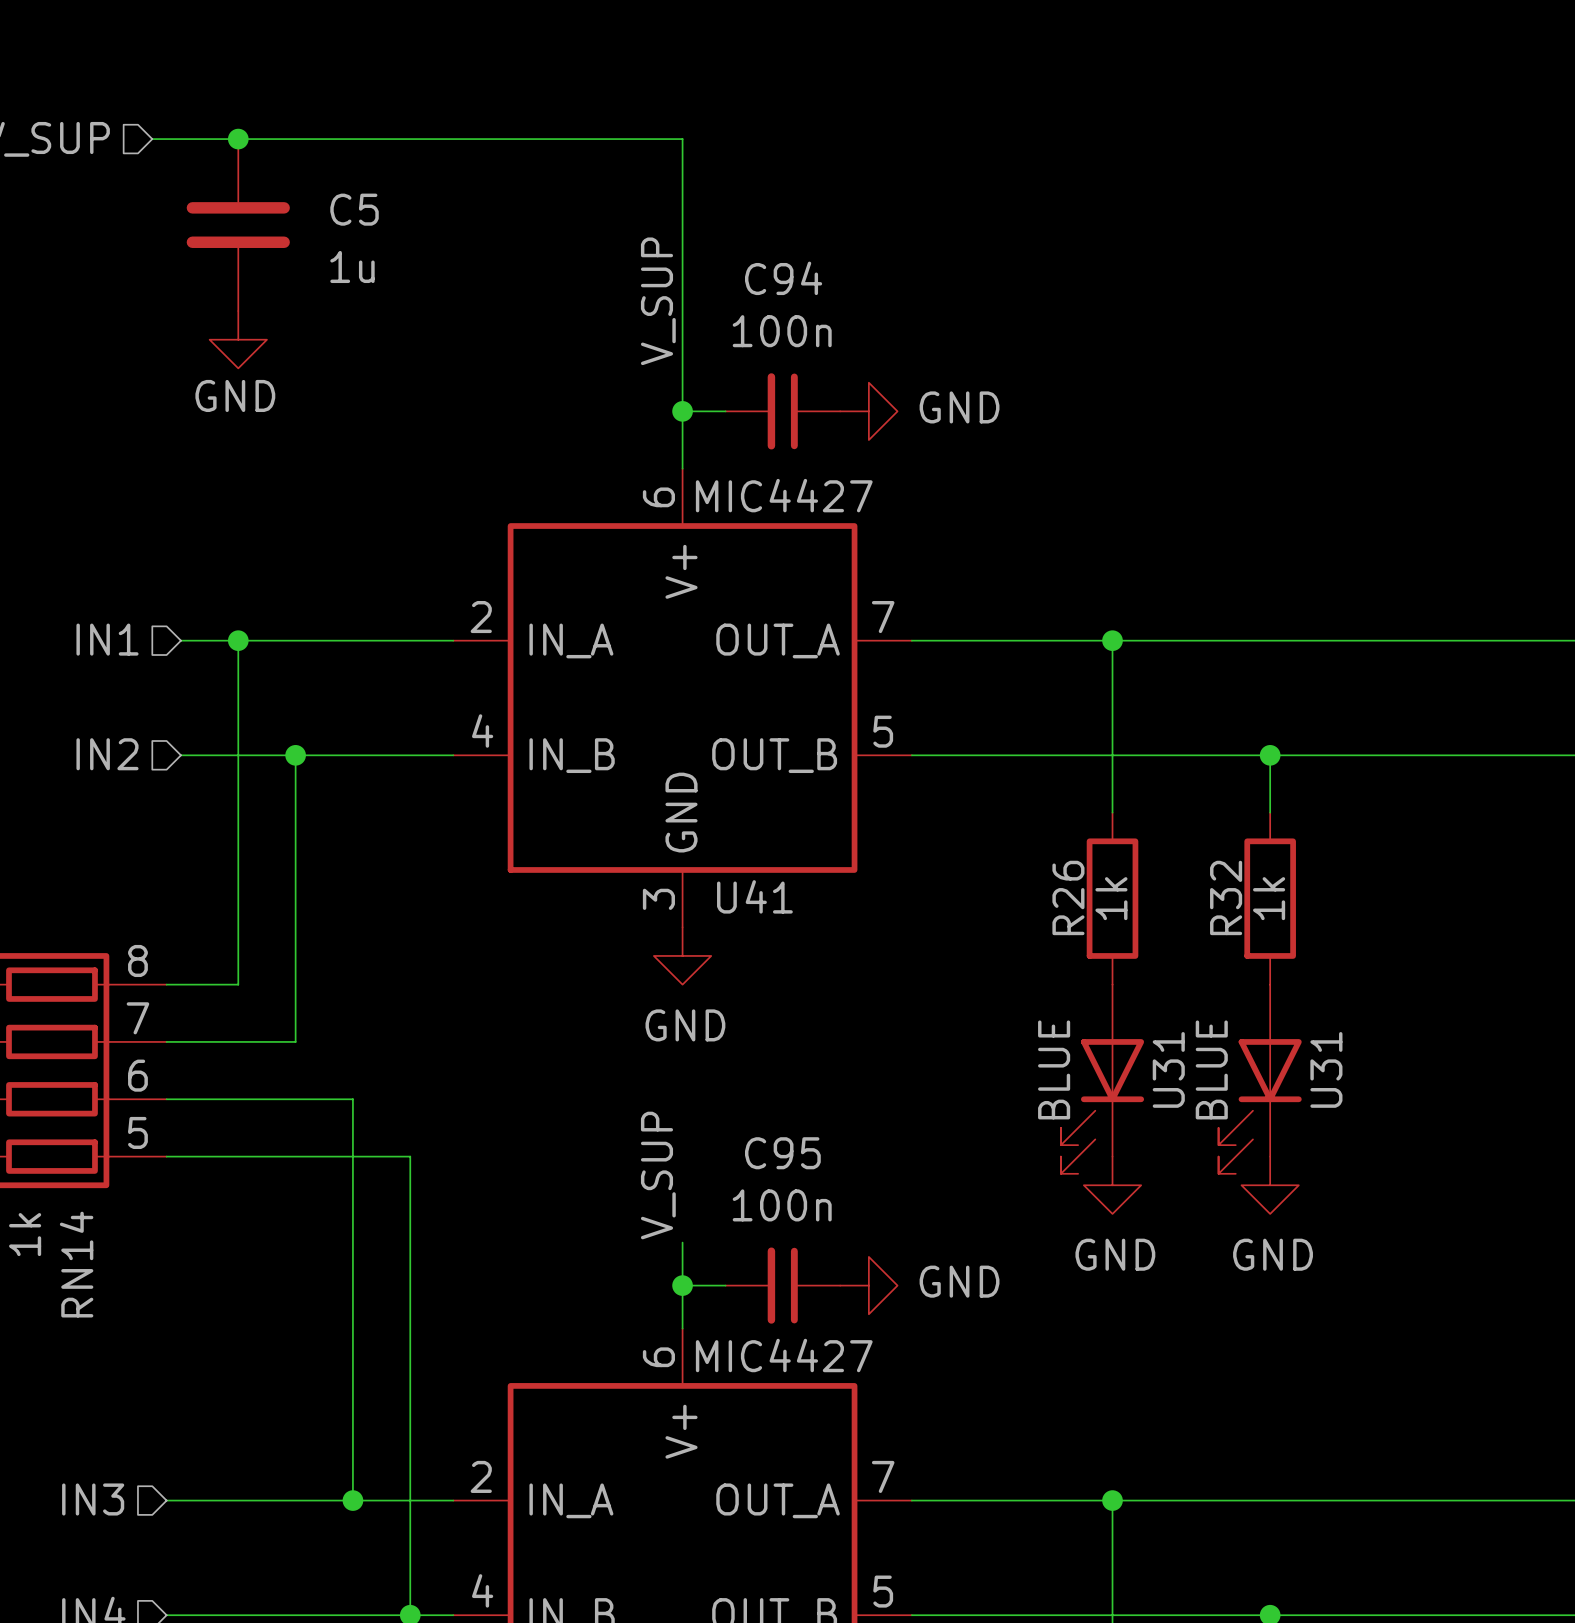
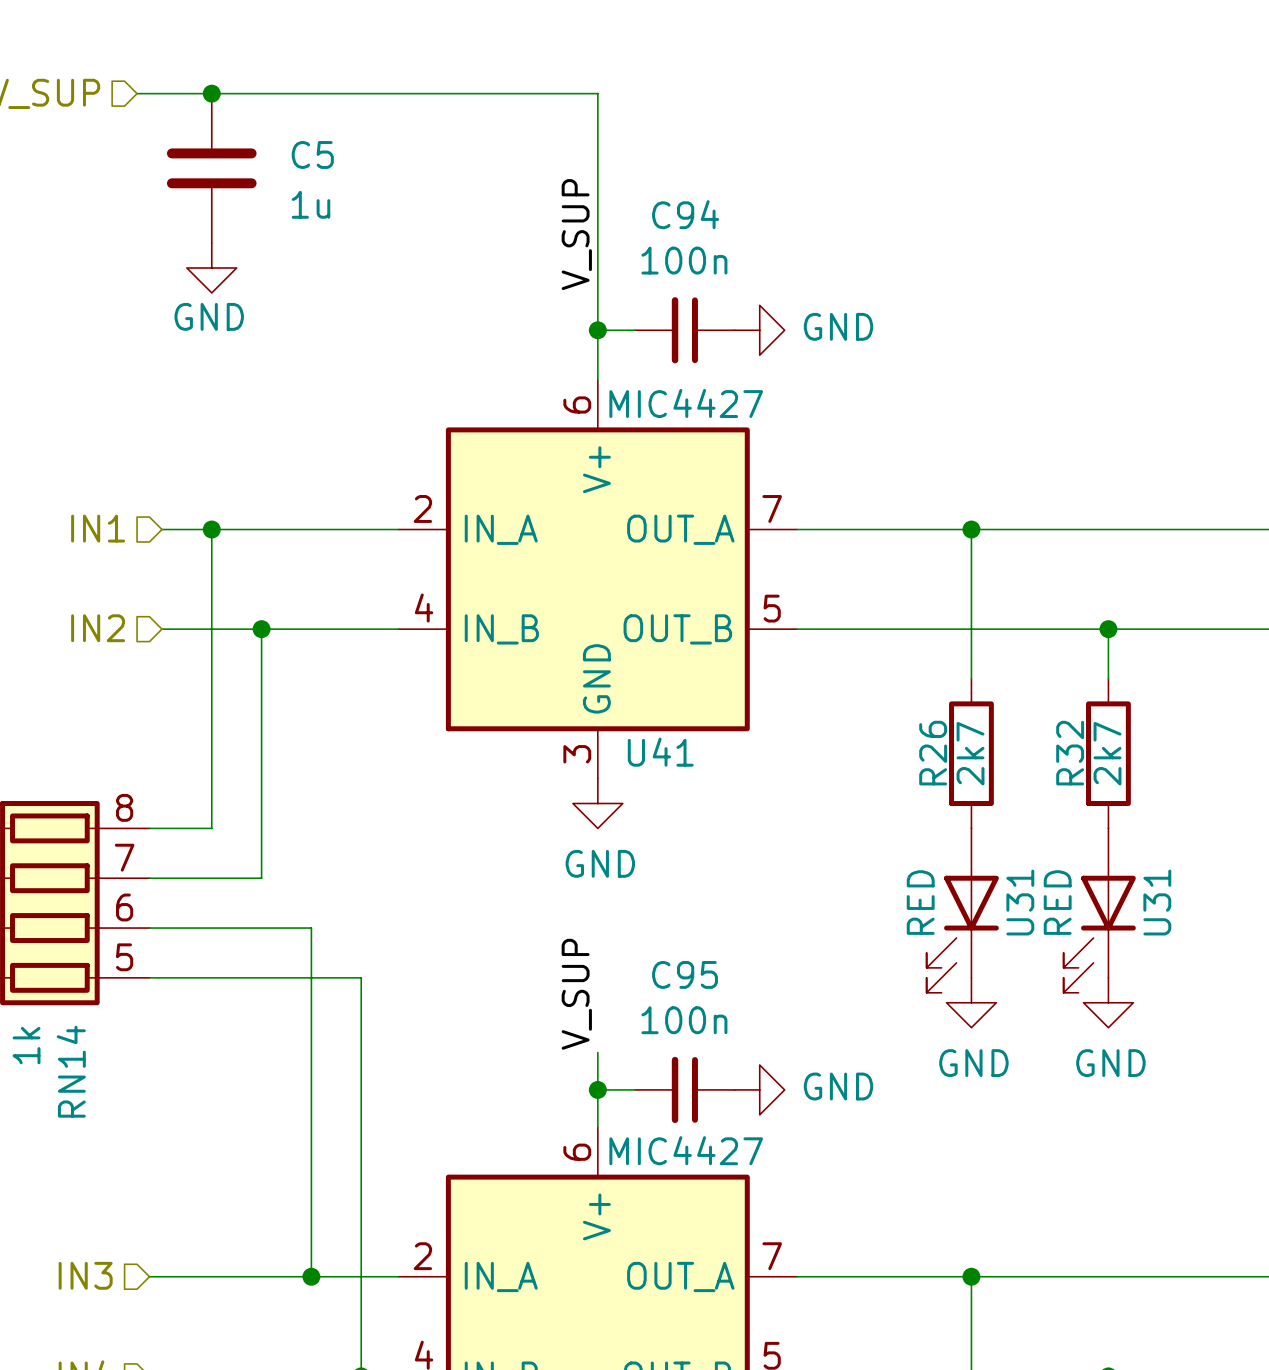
R26 value: 1k (1111, 898) -> 2k7 (970, 753)
R32 value: 1k (1269, 898) -> 2k7 (1107, 753)
U31 value: BLUE (1054, 1069) -> RED (920, 902)
U31 value: BLUE (1211, 1069) -> RED (1057, 902)

